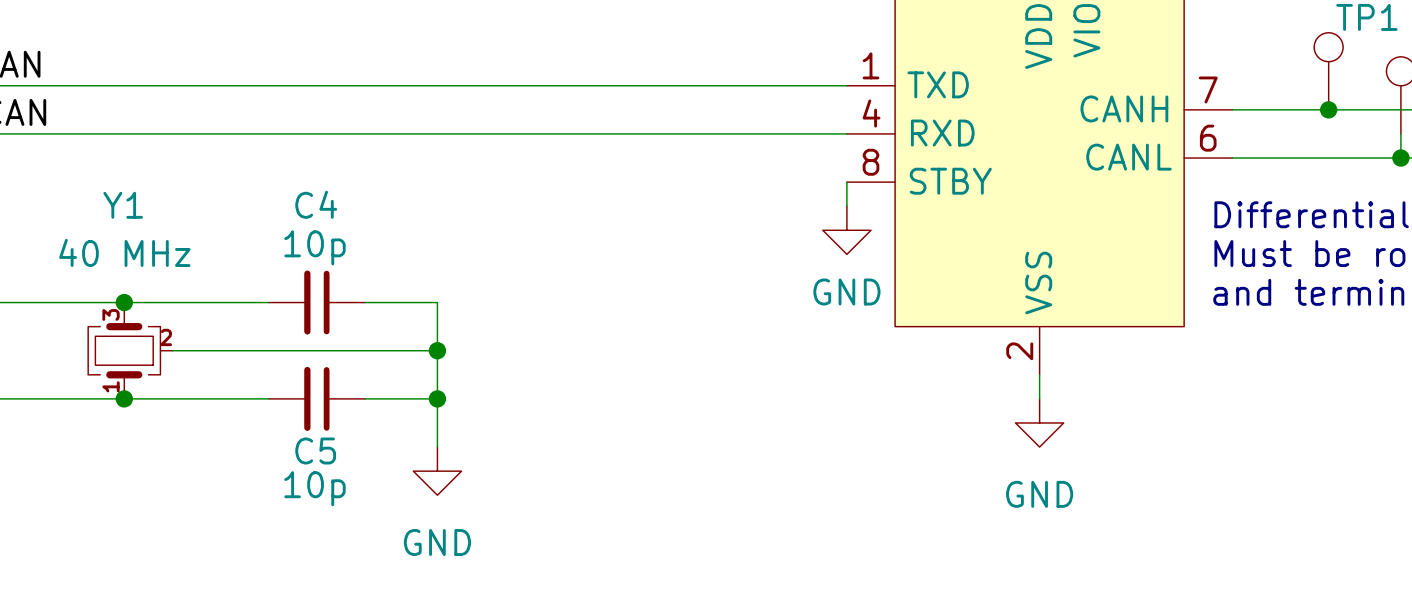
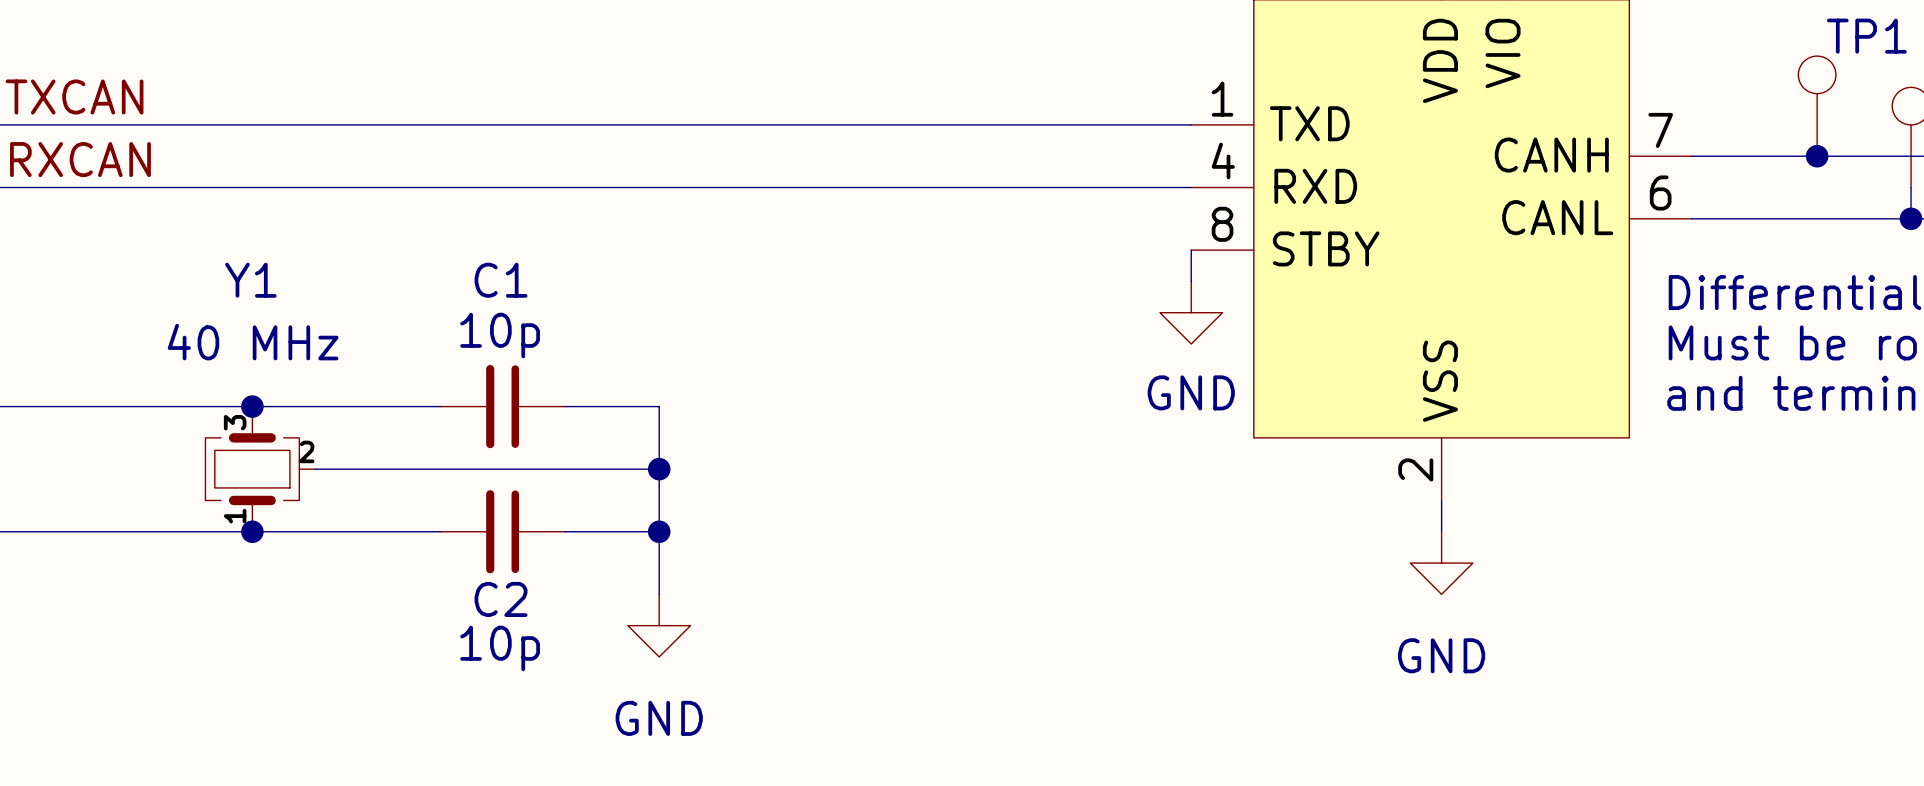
C4 name: C4 (316, 204) -> C1 (501, 280)
C5 name: C5 (315, 450) -> C2 (501, 599)

